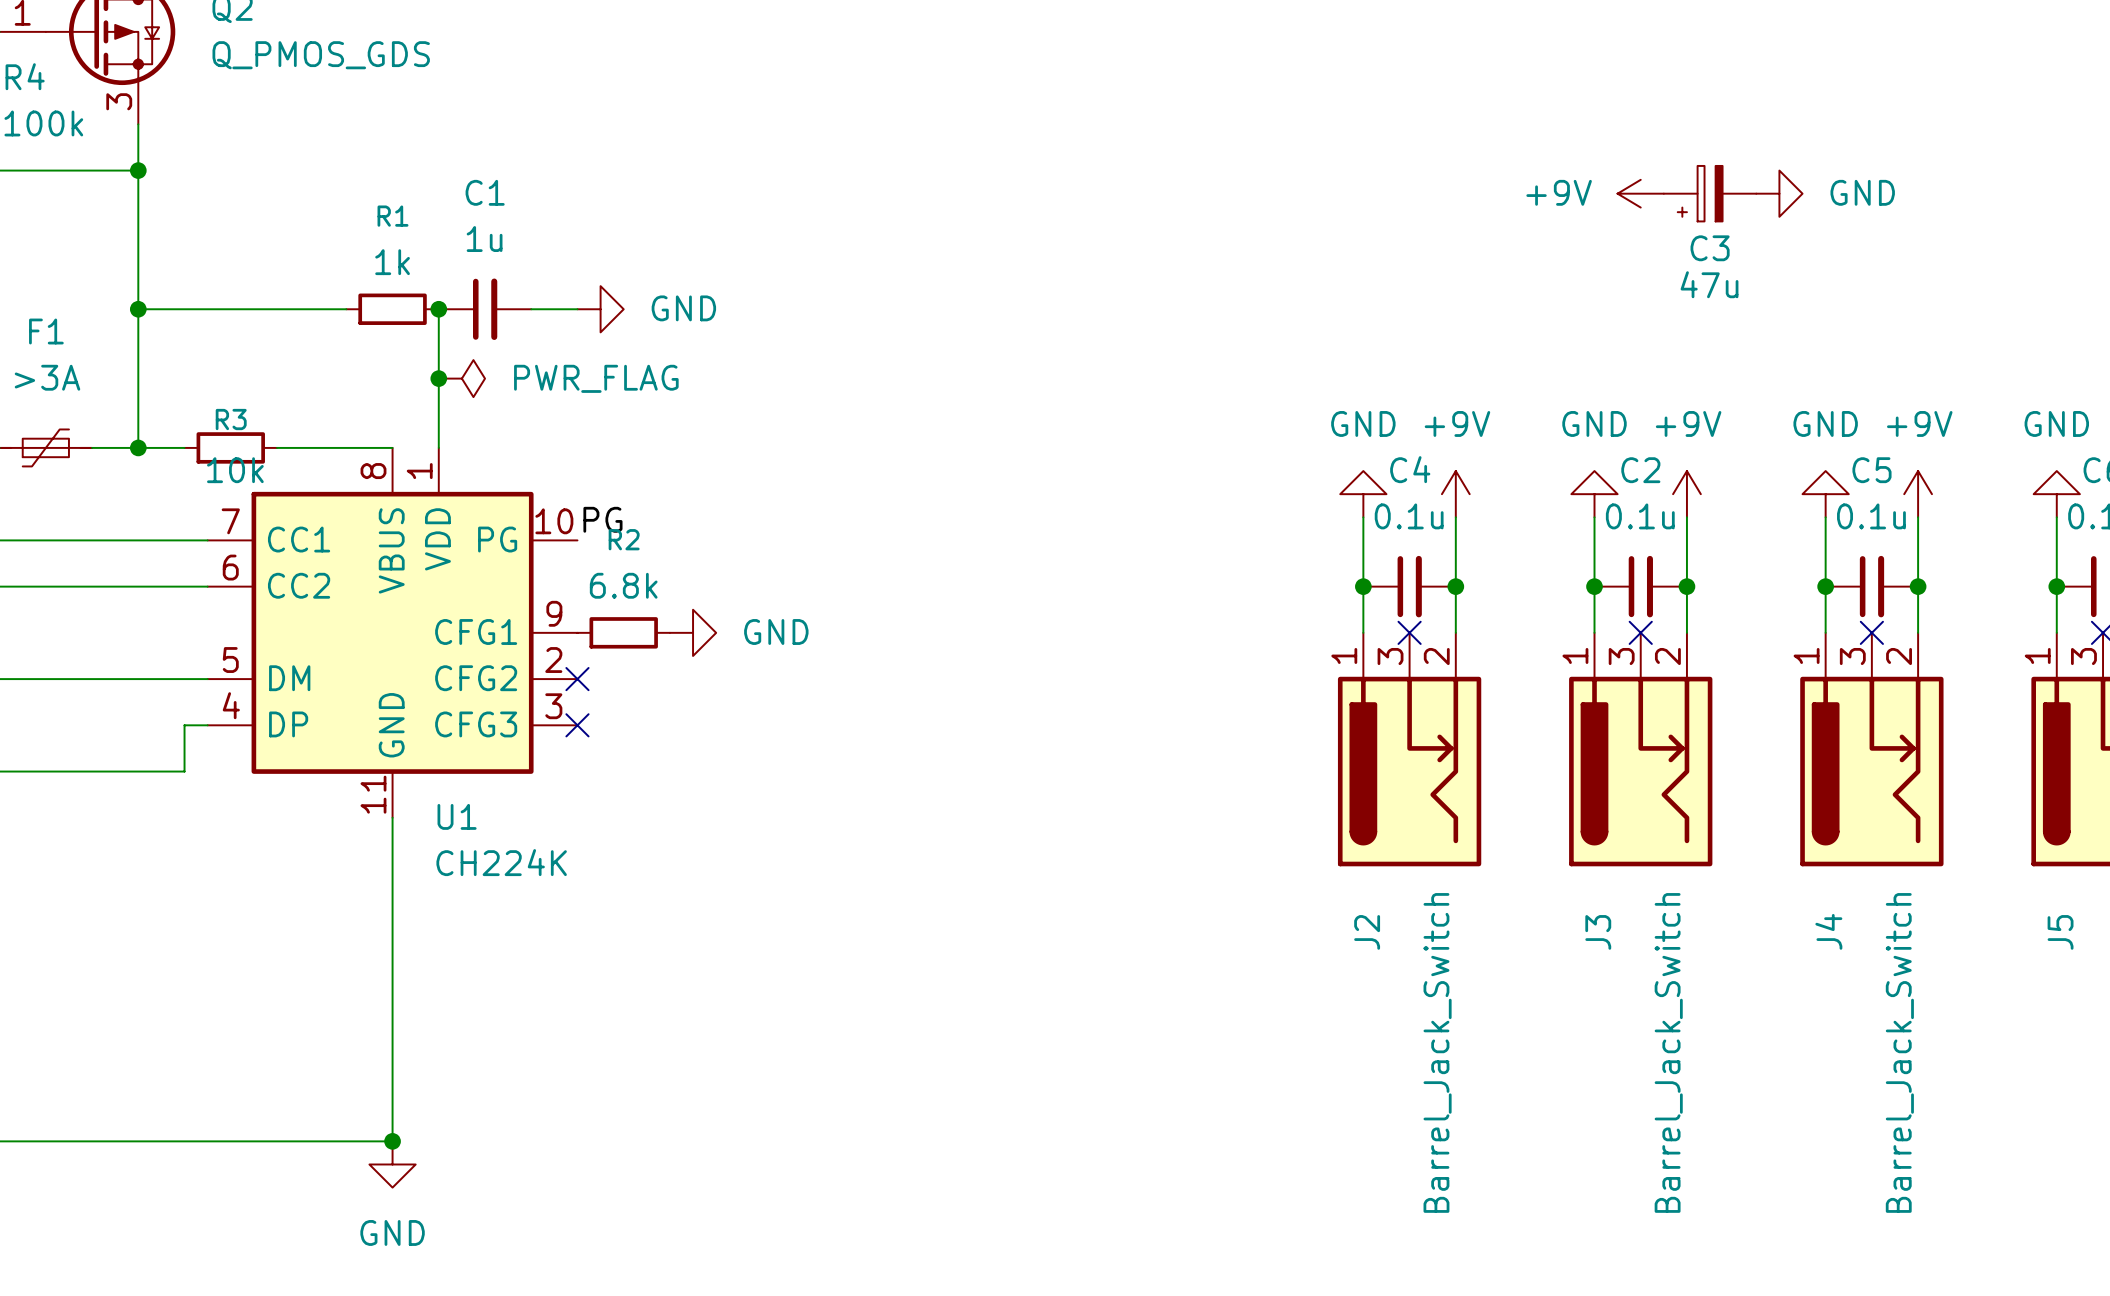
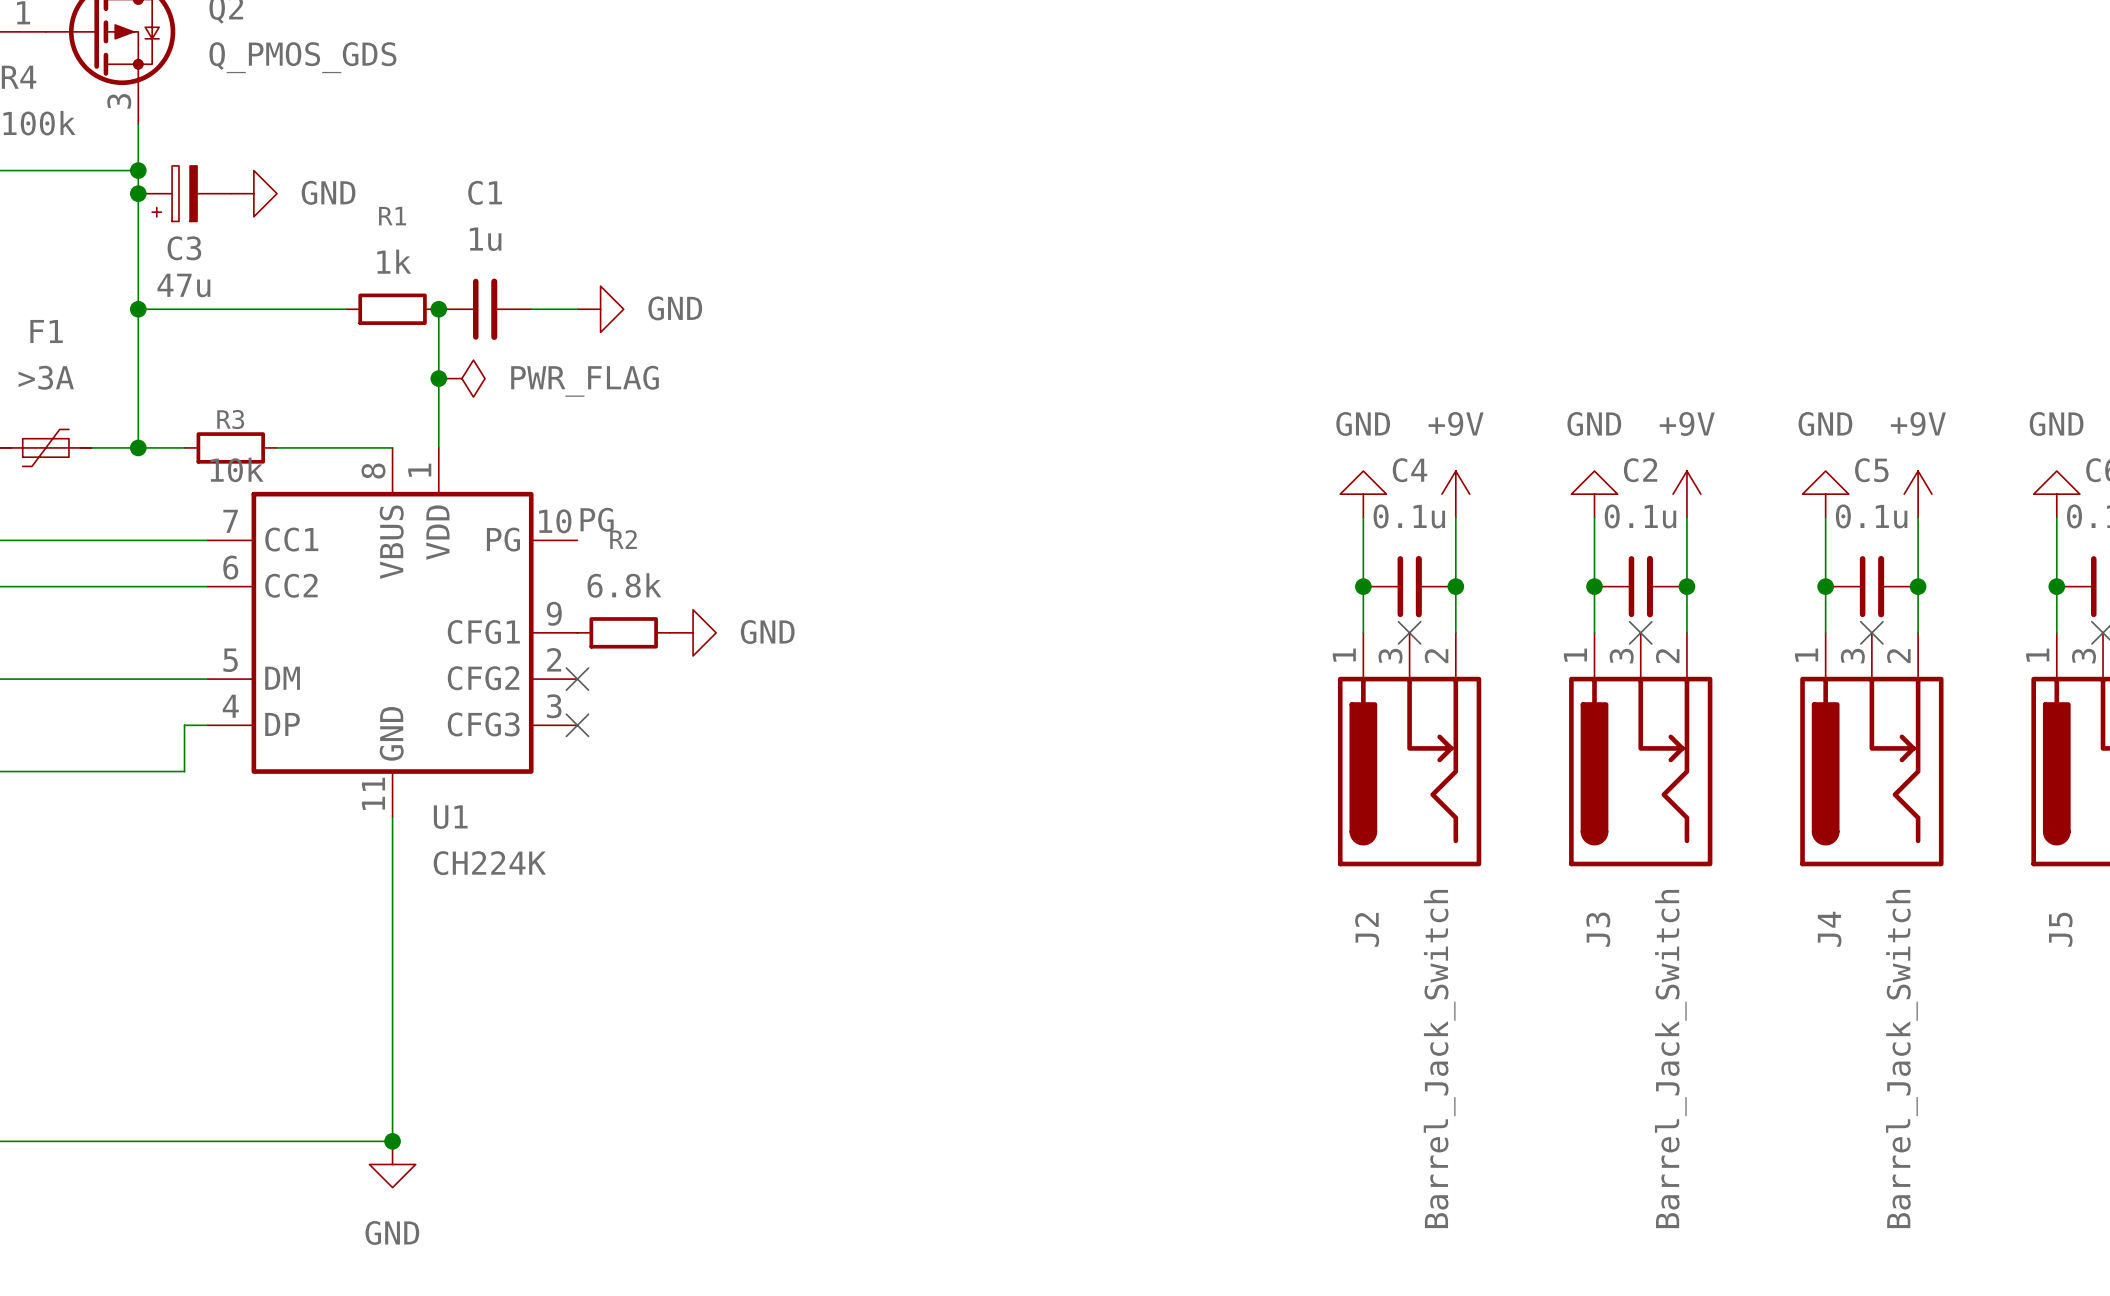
junction: none -> (138, 193)
power symbol: none -> GND (253, 193)
power symbol: +9V (1640, 193) -> none
C3 position: (1710, 193) -> (184, 193)
power symbol: GND (1779, 193) -> none

